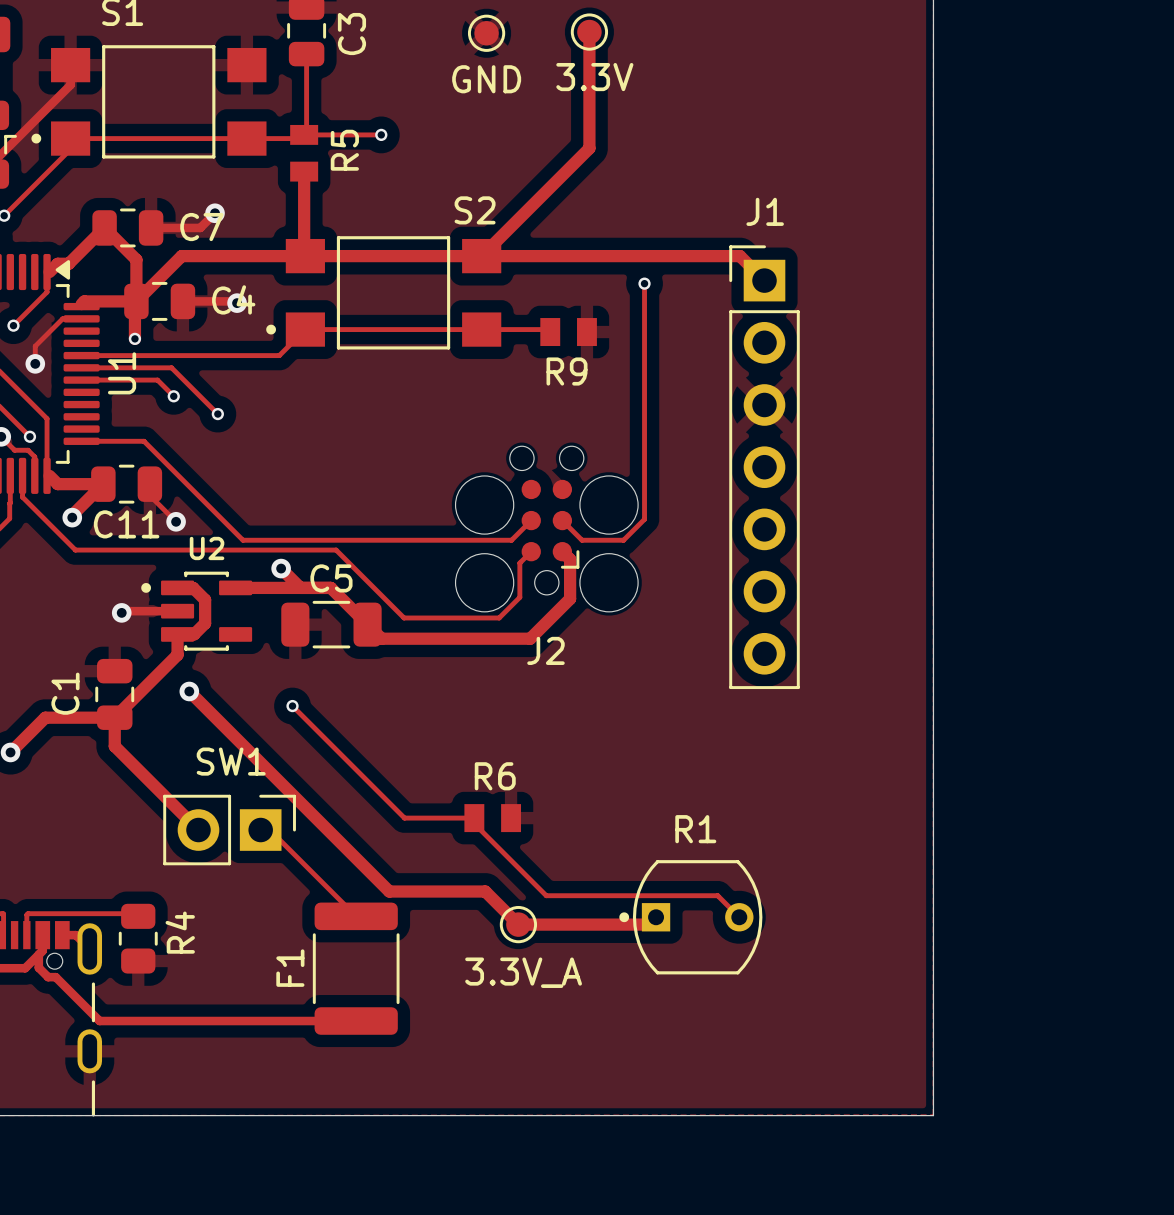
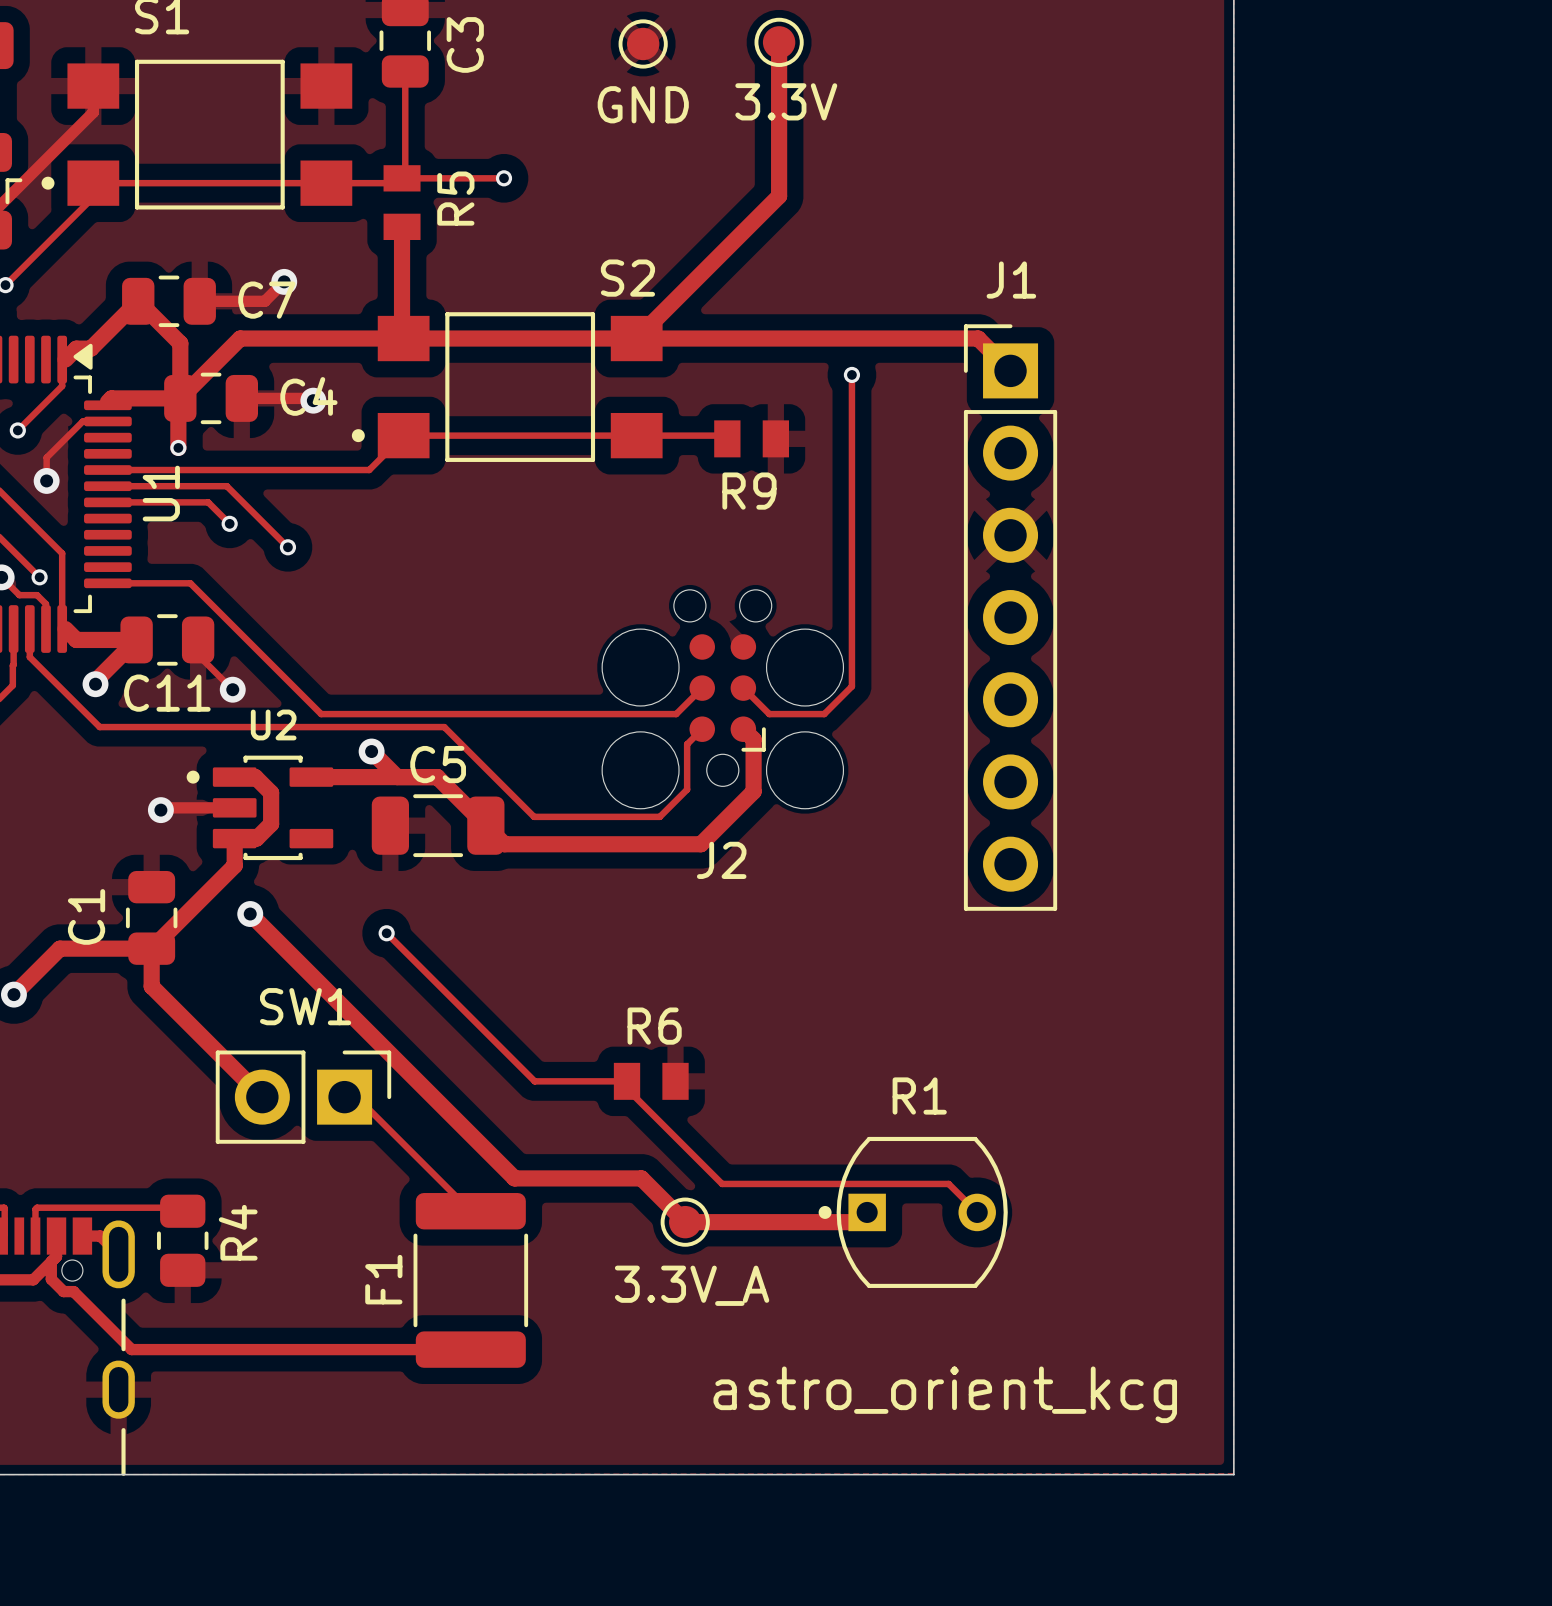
text: none -> astro_orient_kcg (945, 1394)

